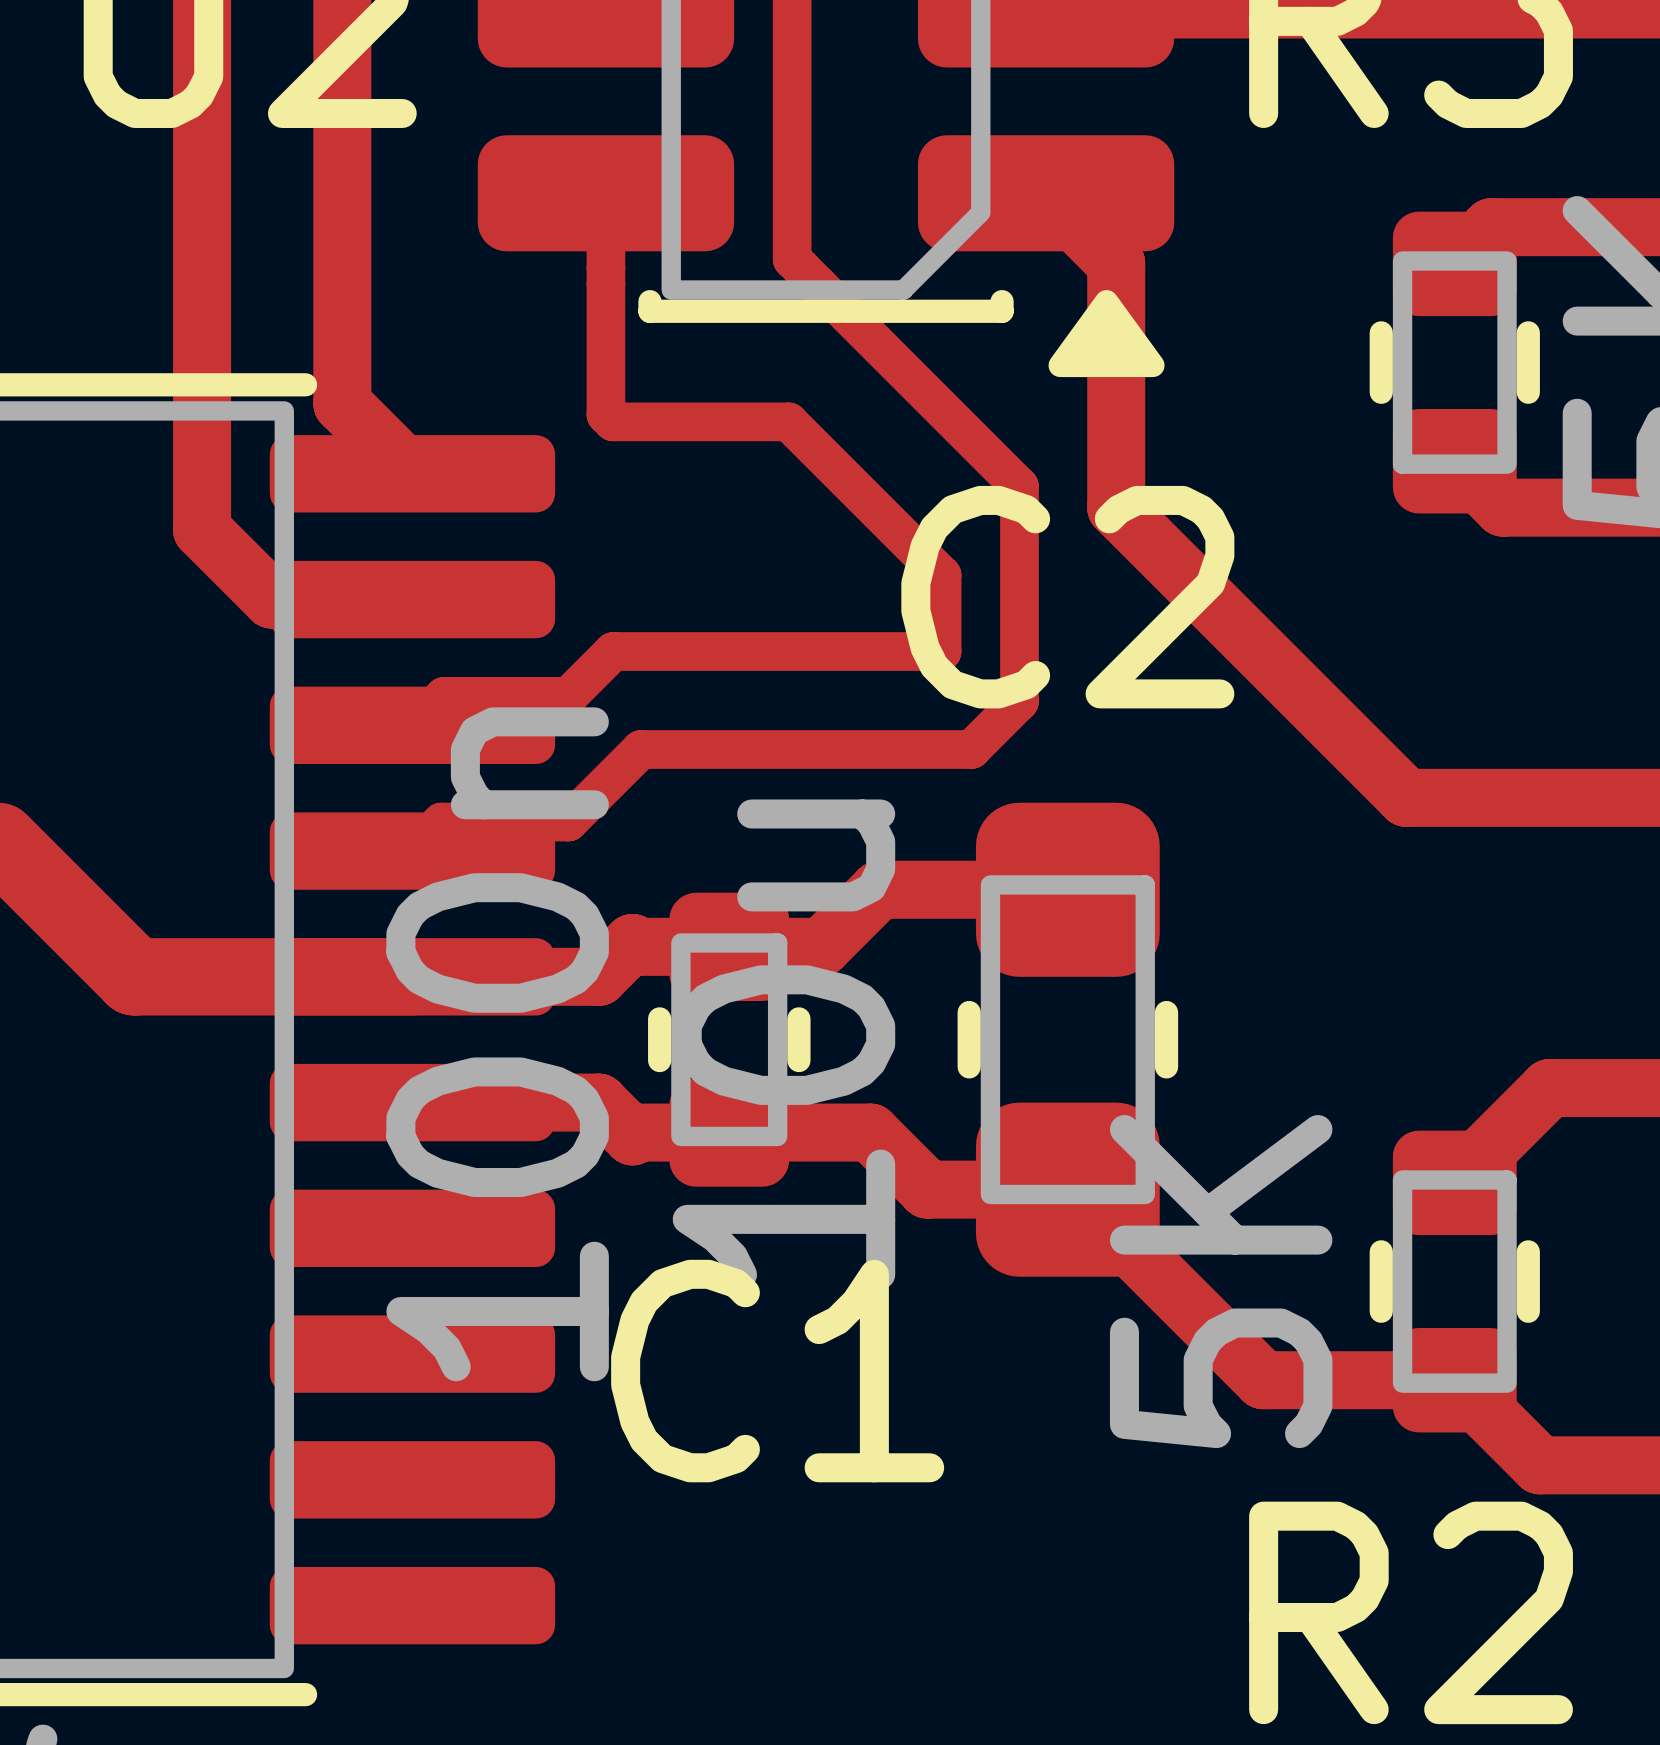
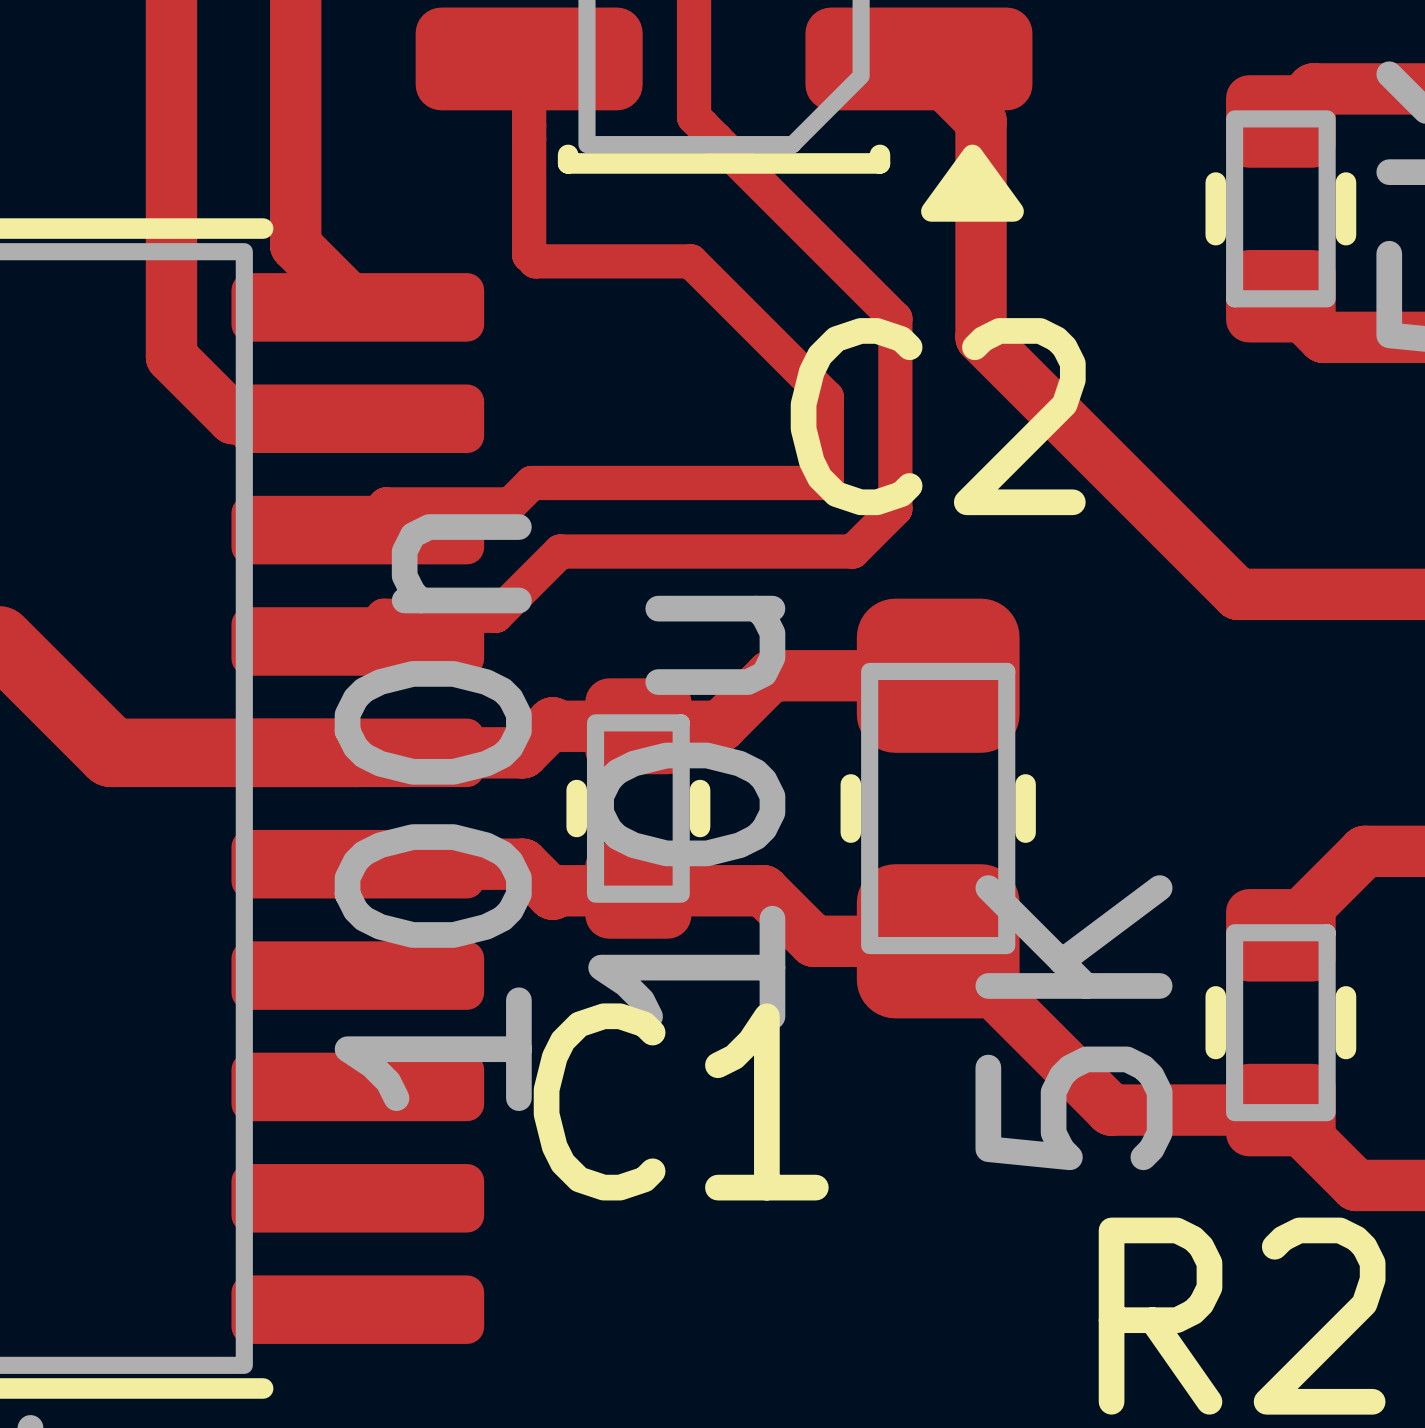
track: (942, 651) (613, 651) (568, 696) -> (826, 464) (826, 480) (824, 482) (531, 482) (510, 504) (495, 504)

